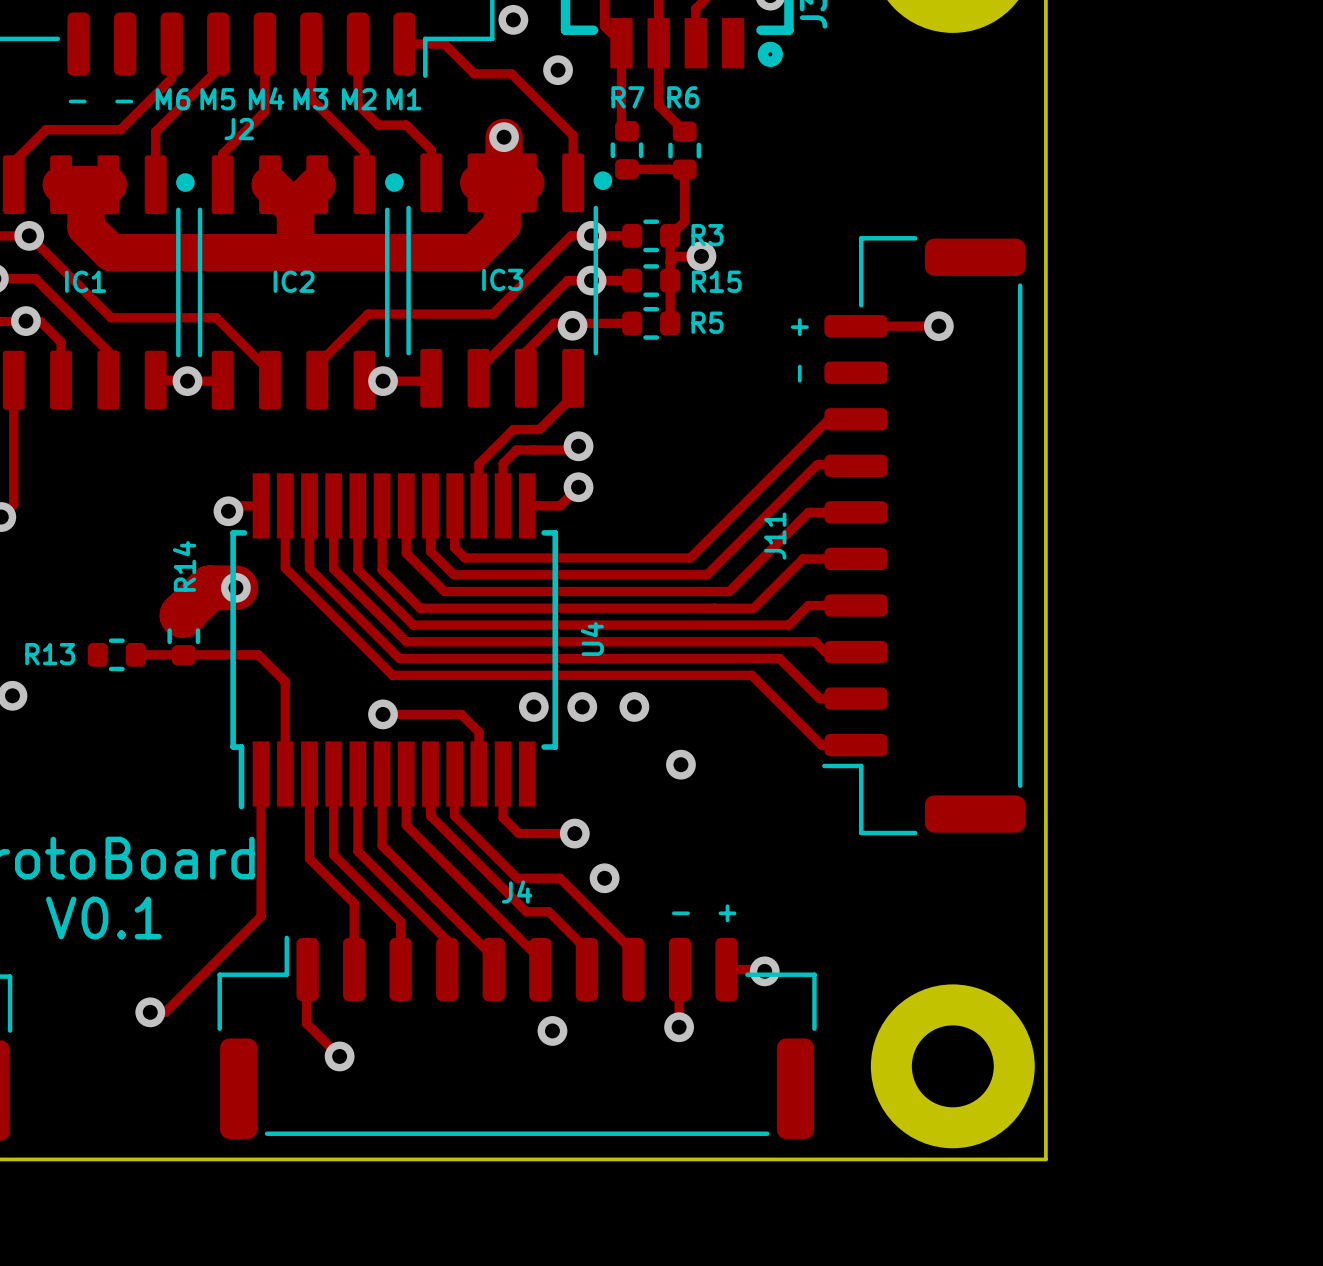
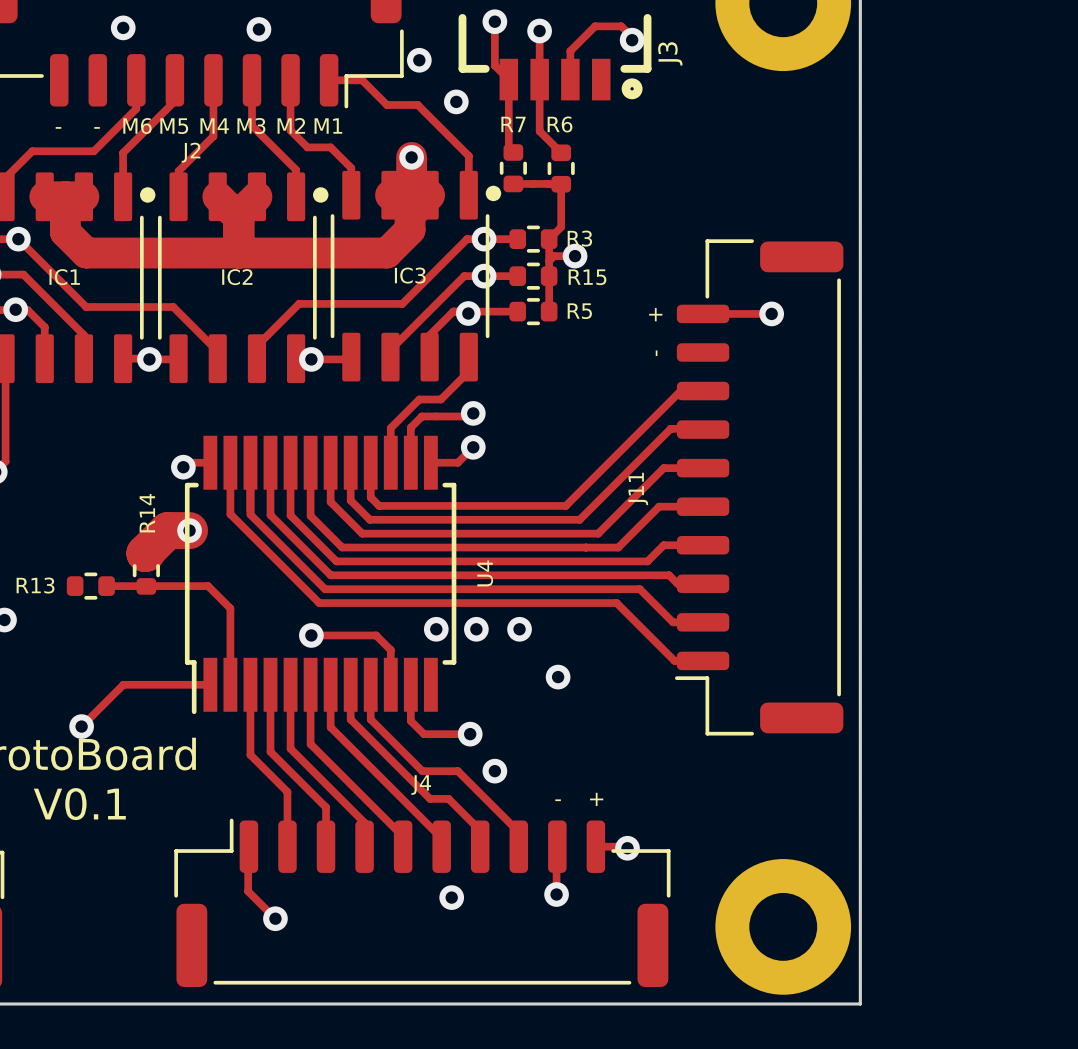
track: (261, 773) (261, 916) (165, 1012) (150, 1012) -> (210, 684) (123, 684) (81, 726)
via position: (150, 1012) -> (81, 726)

